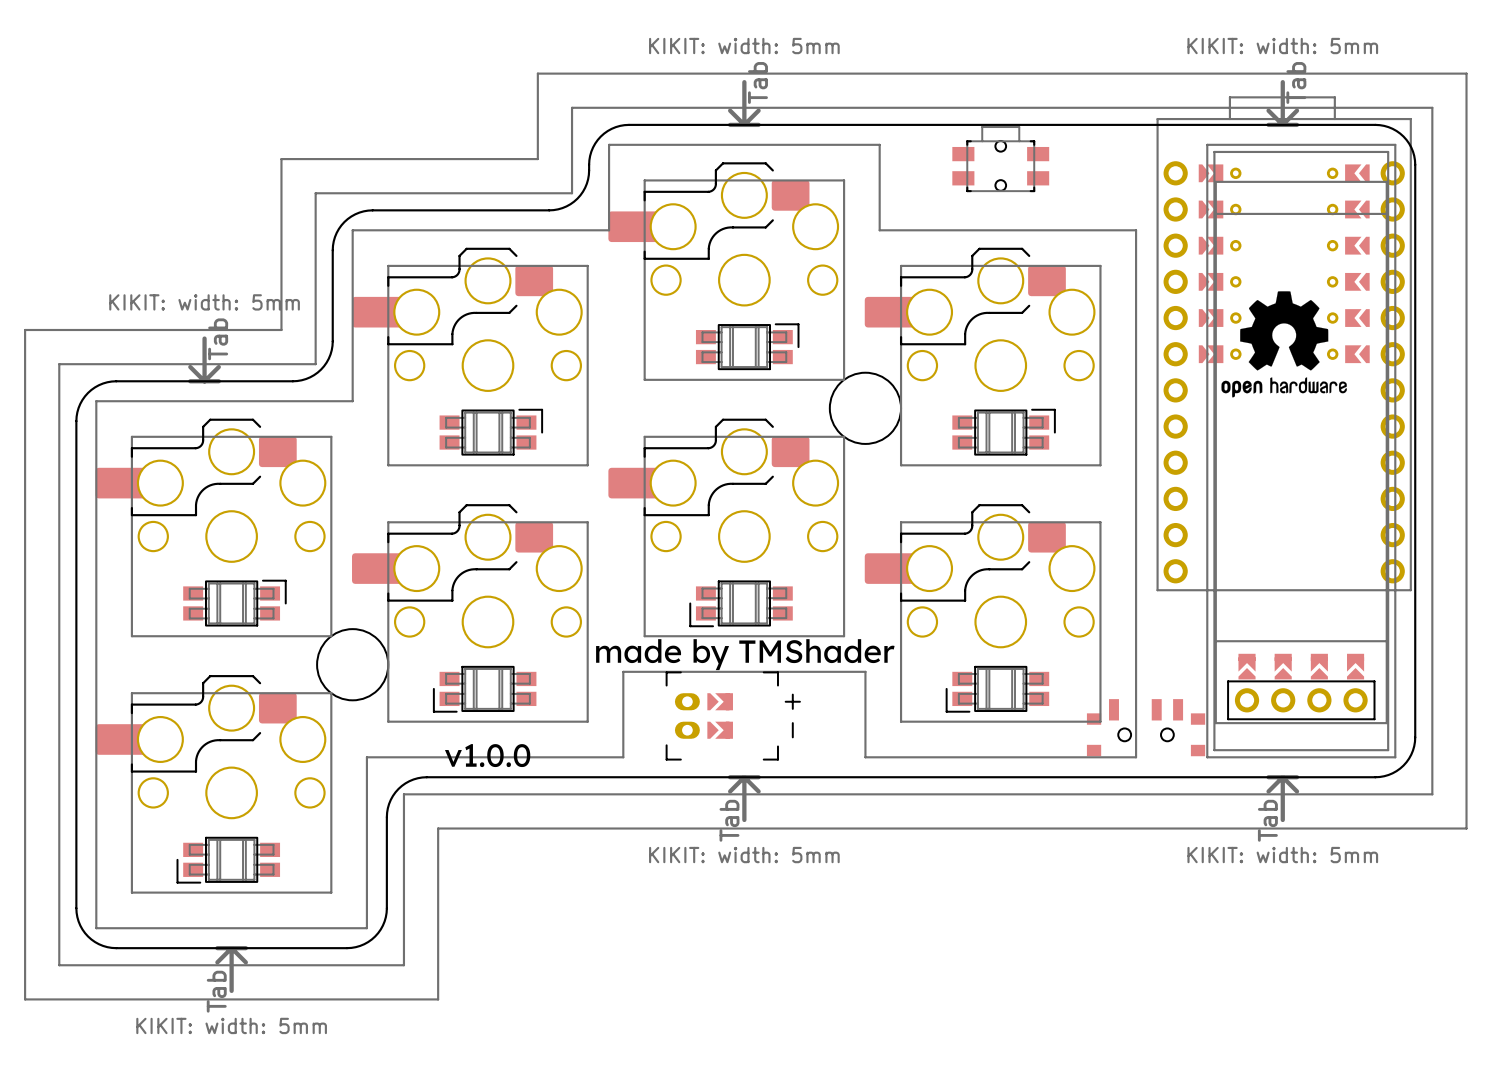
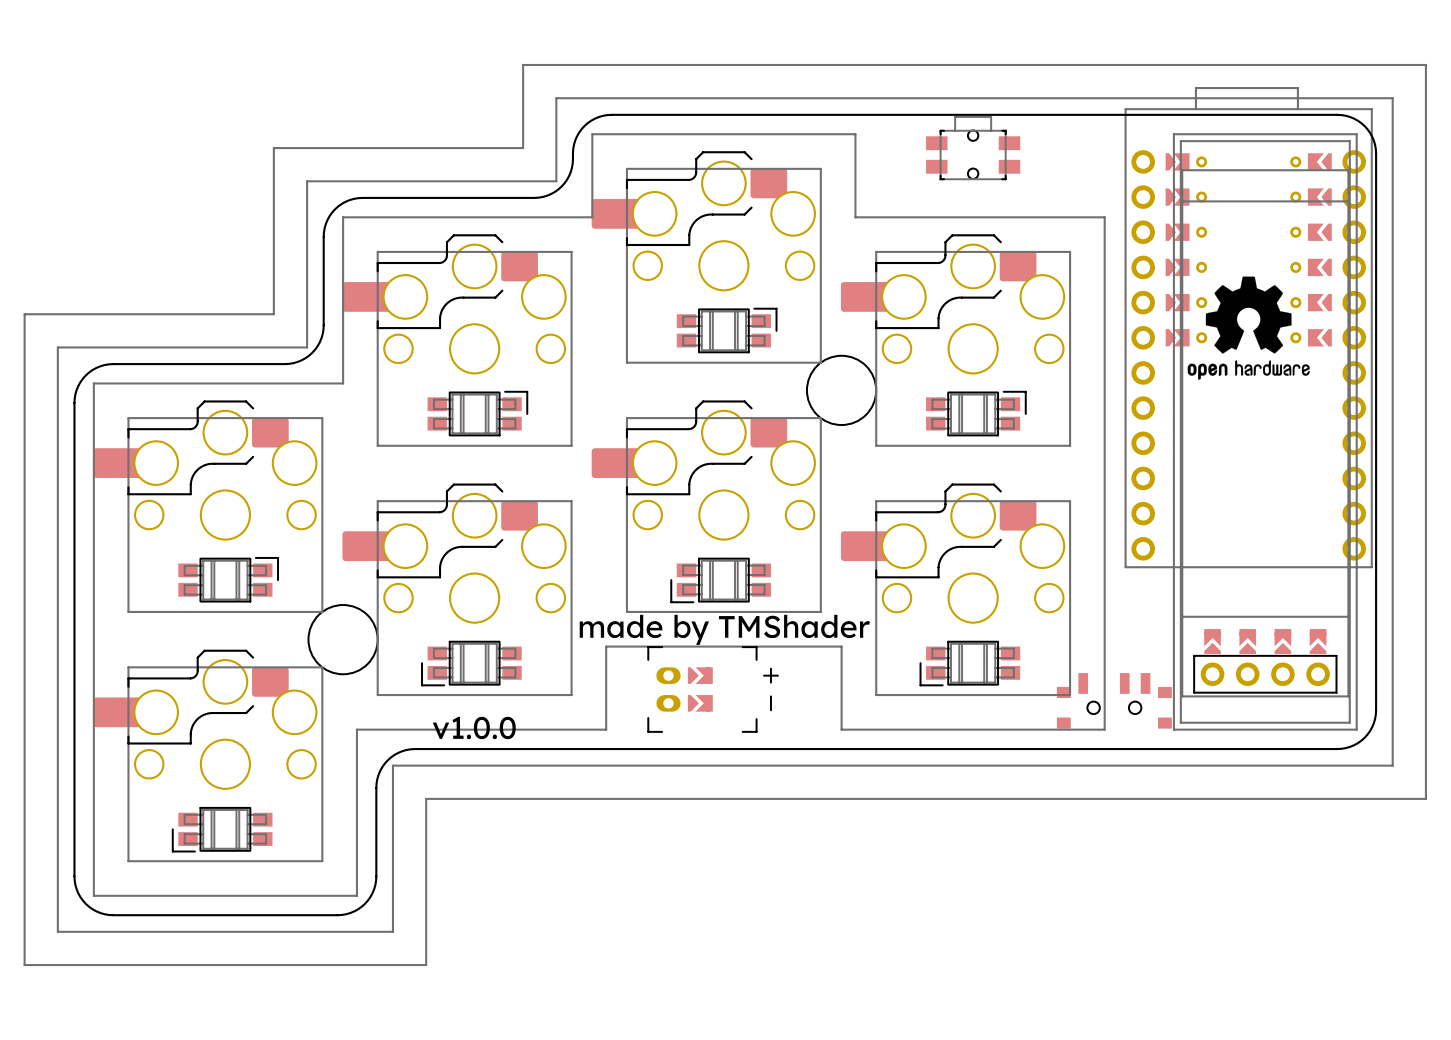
drawing: [75, 80, 1417, 994] -> none
board edge: none -> (611, 114) (1337, 114) (1350, 117) (1361, 123) (1372, 136) (1376, 153) (1376, 710) (1373, 723) (1367, 734) (1354, 745) (1337, 749) (410, 749) (390, 757) (378, 775) (376, 787) (375, 885) (367, 900) (354, 911) (337, 915) (113, 915) (100, 913) (89, 906) (78, 893) (74, 876) (74, 402) (80, 382) (92, 370) (108, 364) (284, 364) (301, 360) (315, 349) (322, 333) (323, 232) (329, 216) (338, 206) (349, 200) (362, 197) (534, 197) (546, 195) (561, 186) (569, 175) (572, 163) (573, 144) (581, 129) (594, 118) (611, 114)

